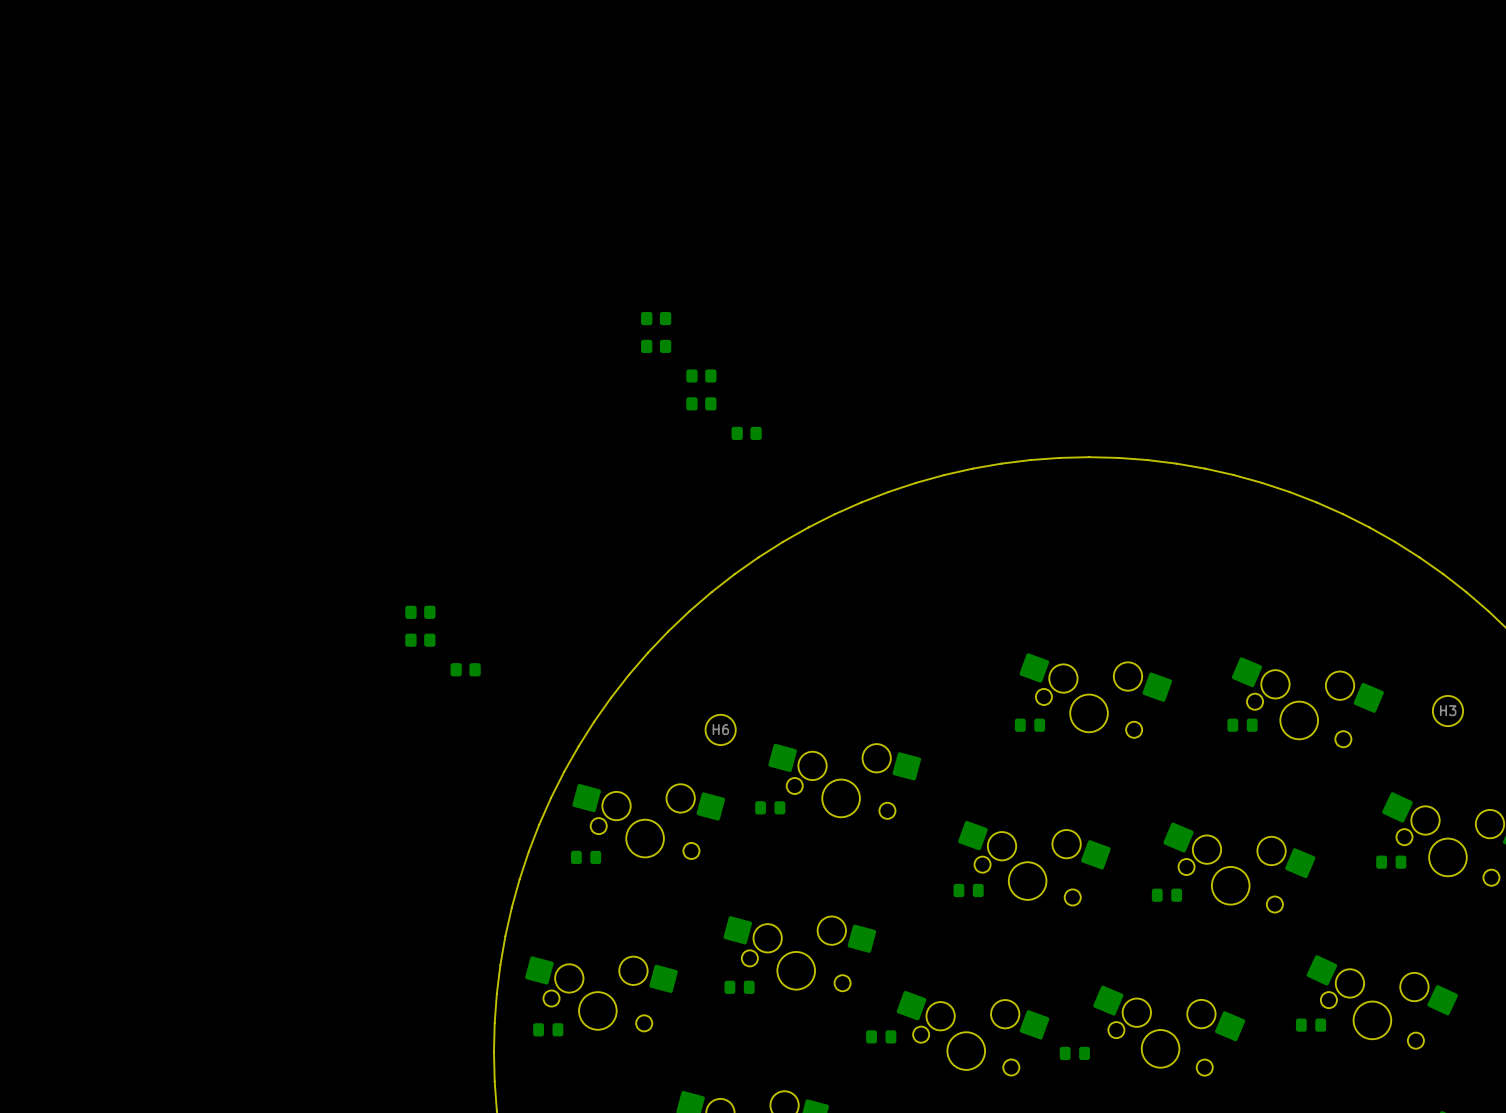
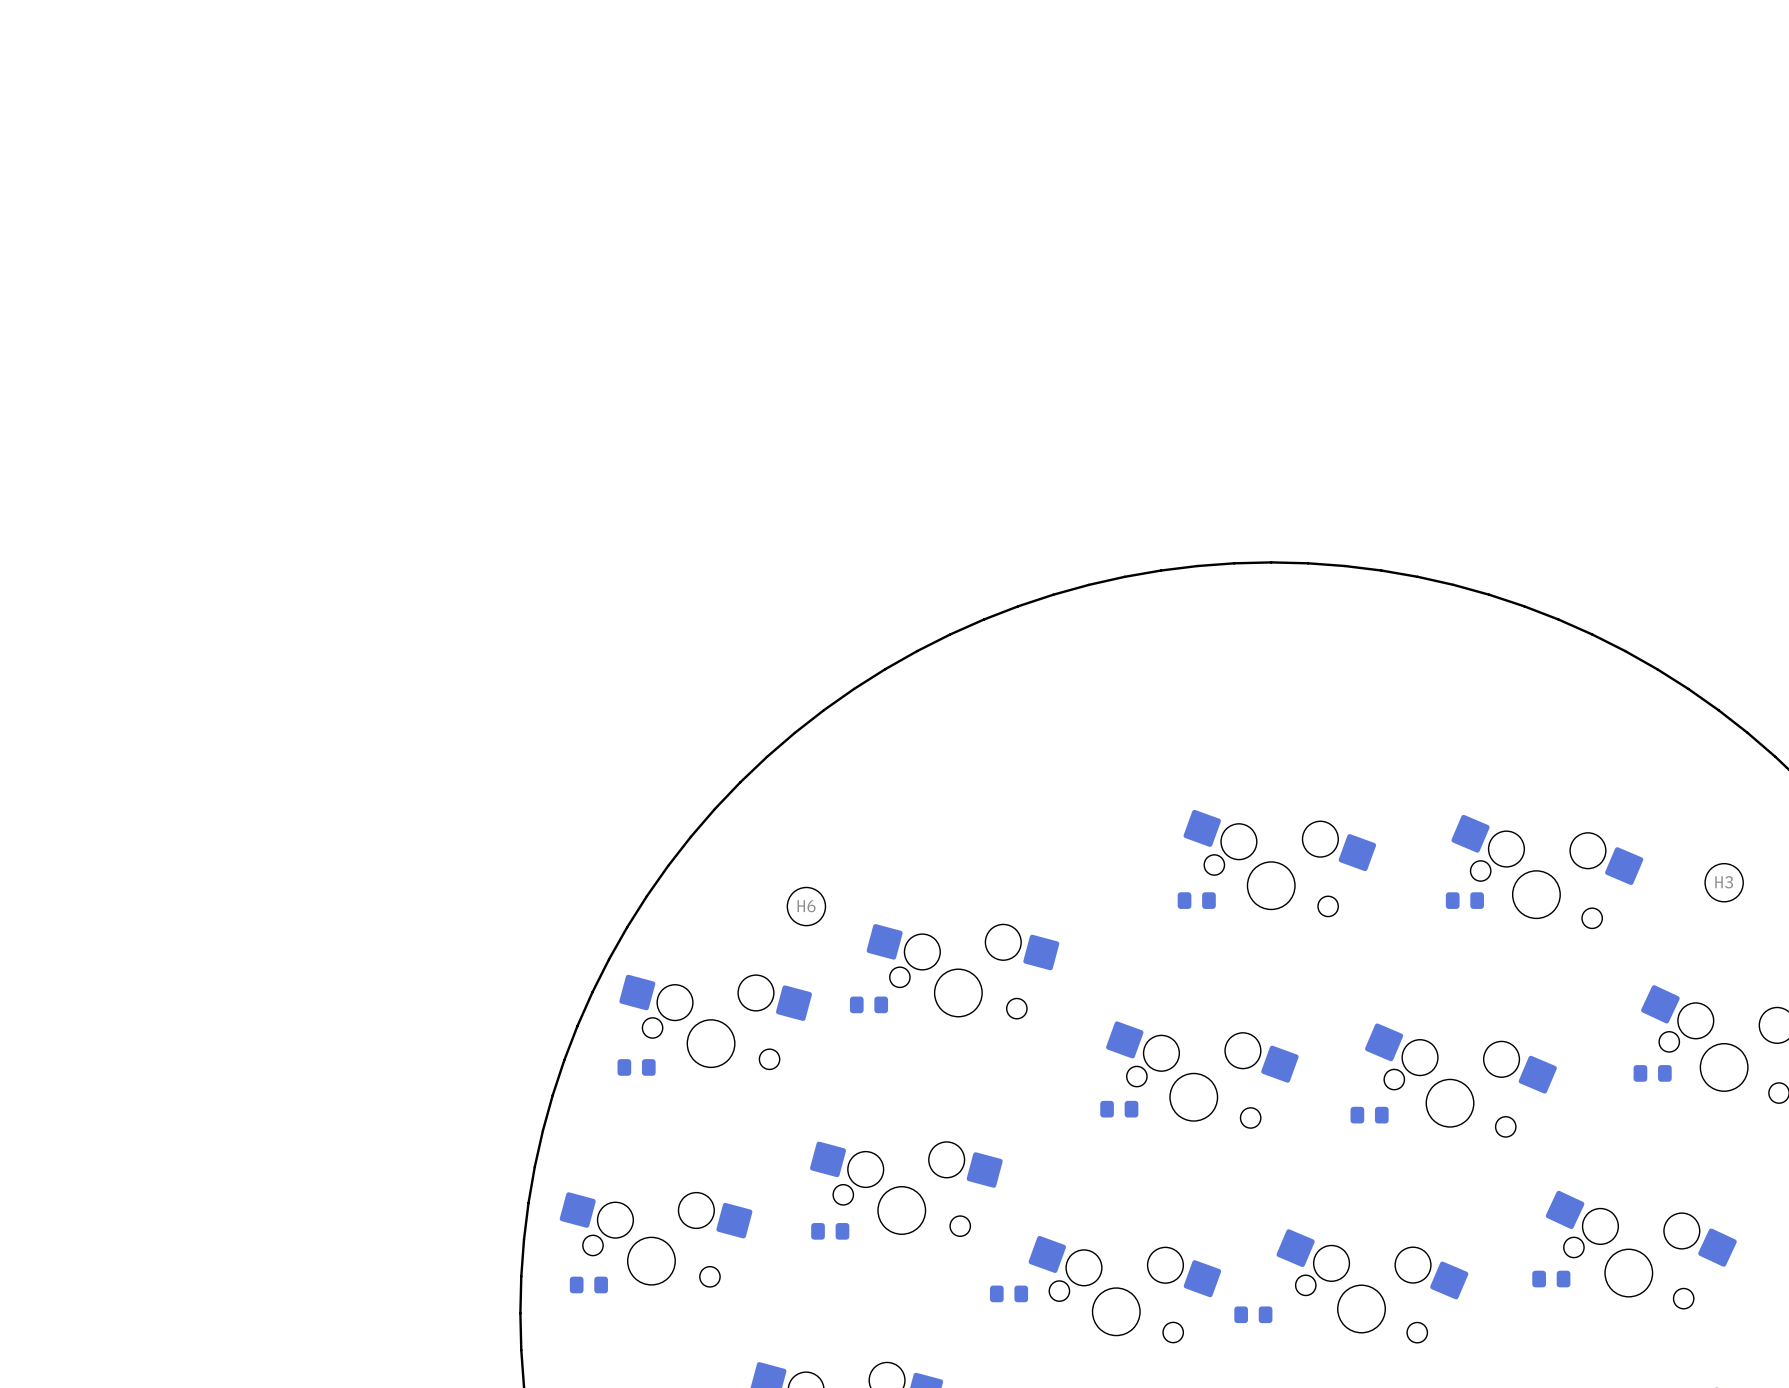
part: (656, 318) -> none
part: (656, 346) -> none
part: (701, 375) -> none
part: (701, 403) -> none
part: (746, 433) -> none
part: (420, 612) -> none
part: (420, 640) -> none
part: (465, 669) -> none

